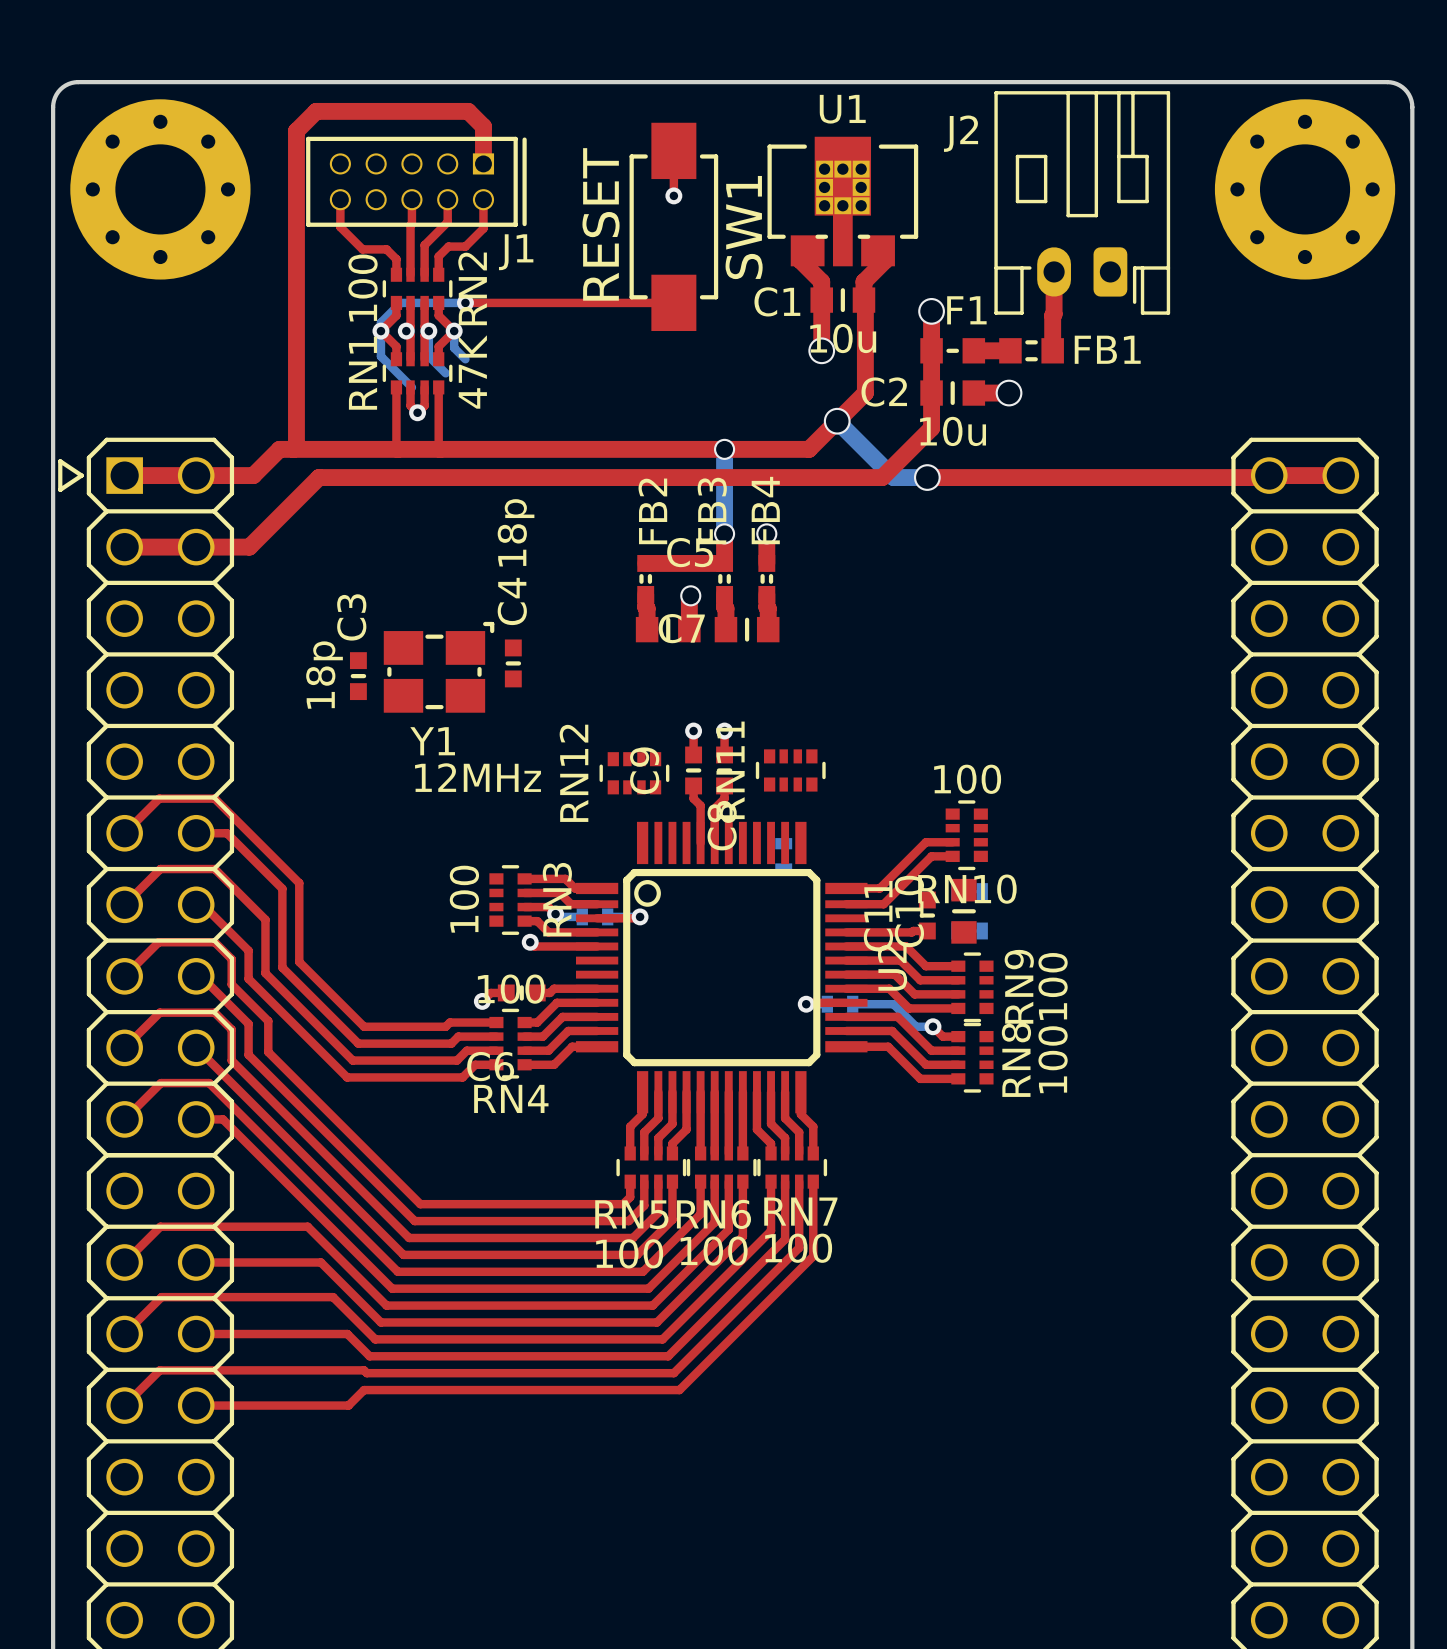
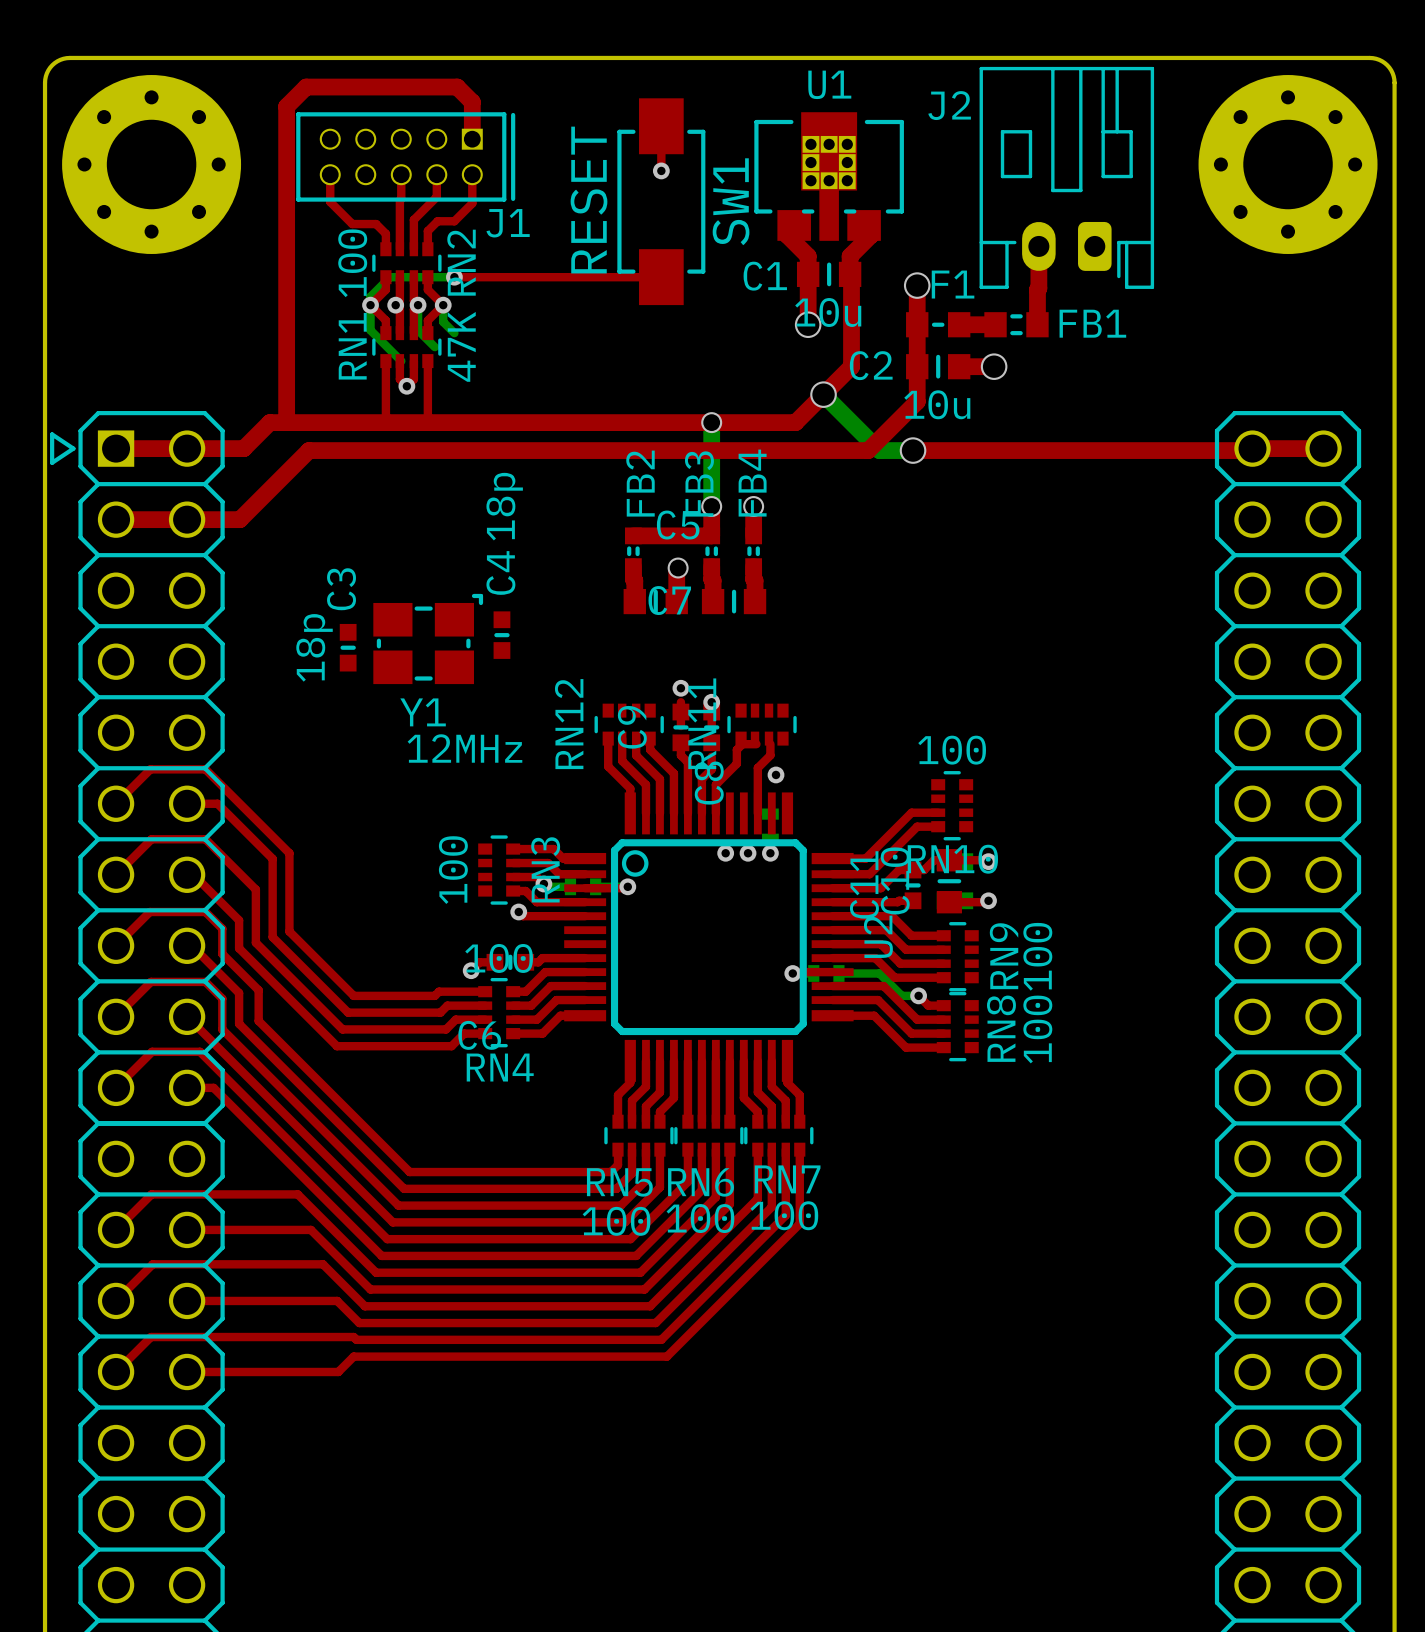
via position: (693, 731) -> (680, 688)
top track: none -> (608, 738) (608, 766) (630, 788) (630, 813)
top track: none -> (622, 738) (622, 760) (645, 784) (645, 813)
top track: none -> (636, 738) (636, 755) (659, 779) (659, 813)
top track: none -> (650, 738) (650, 749) (673, 773) (673, 813)
C9 position: (693, 770) -> (680, 727)
C8 position: (724, 770) -> (711, 727)
RN11 position: (790, 770) -> (762, 724)
RN12 position: (634, 773) -> (629, 724)
top track: none -> (756, 744) (742, 744) (736, 749) (736, 763) (715, 784) (715, 813)
top track: none -> (770, 744) (770, 755) (757, 767) (757, 813)
top track: (693, 785) (693, 798) (700, 805) -> (680, 742) (680, 755) (687, 762) (687, 776)
via: none -> (776, 774)
via: none -> (725, 853)
via: none -> (748, 853)
via: none -> (770, 853)
top track: none -> (988, 861) (934, 860) (924, 870) (899, 870) (880, 888) (832, 888)
via: none -> (988, 861)
top track: none -> (988, 900) (949, 902)
via: none -> (988, 900)

